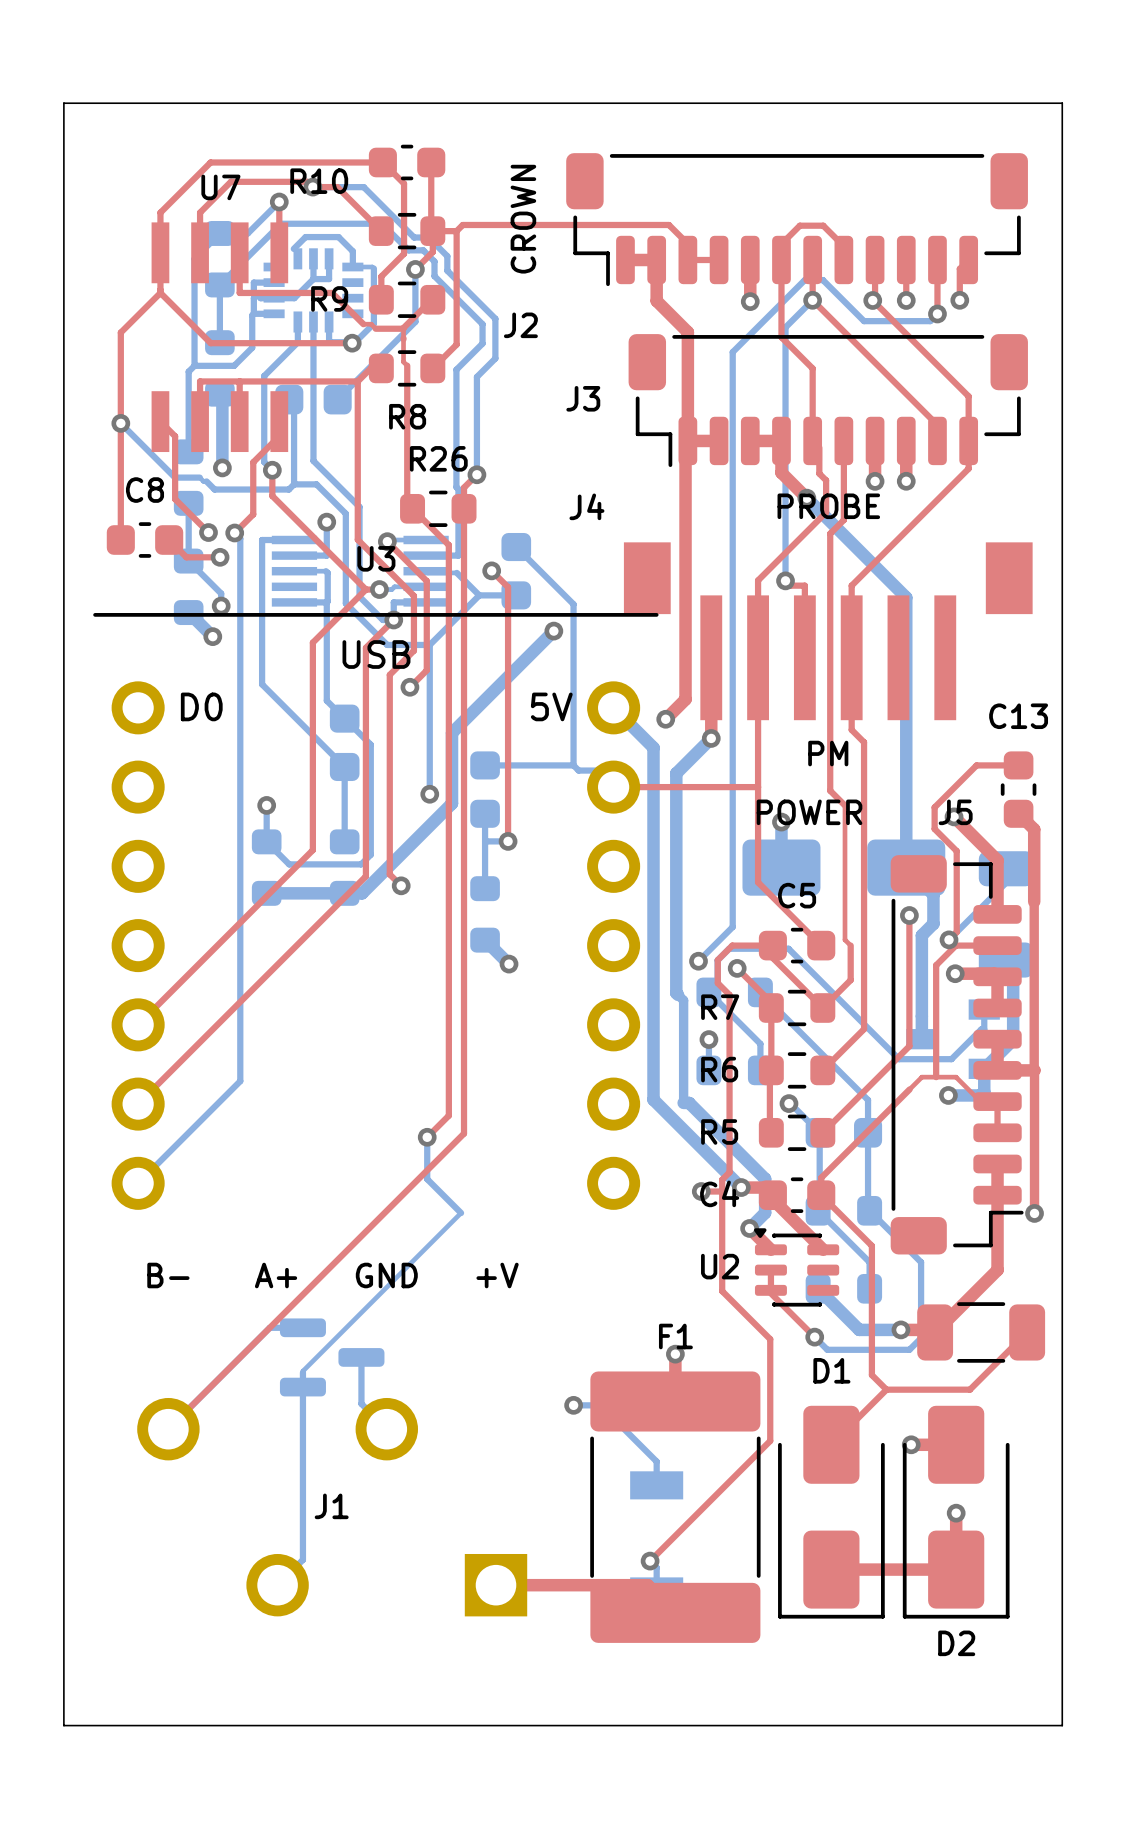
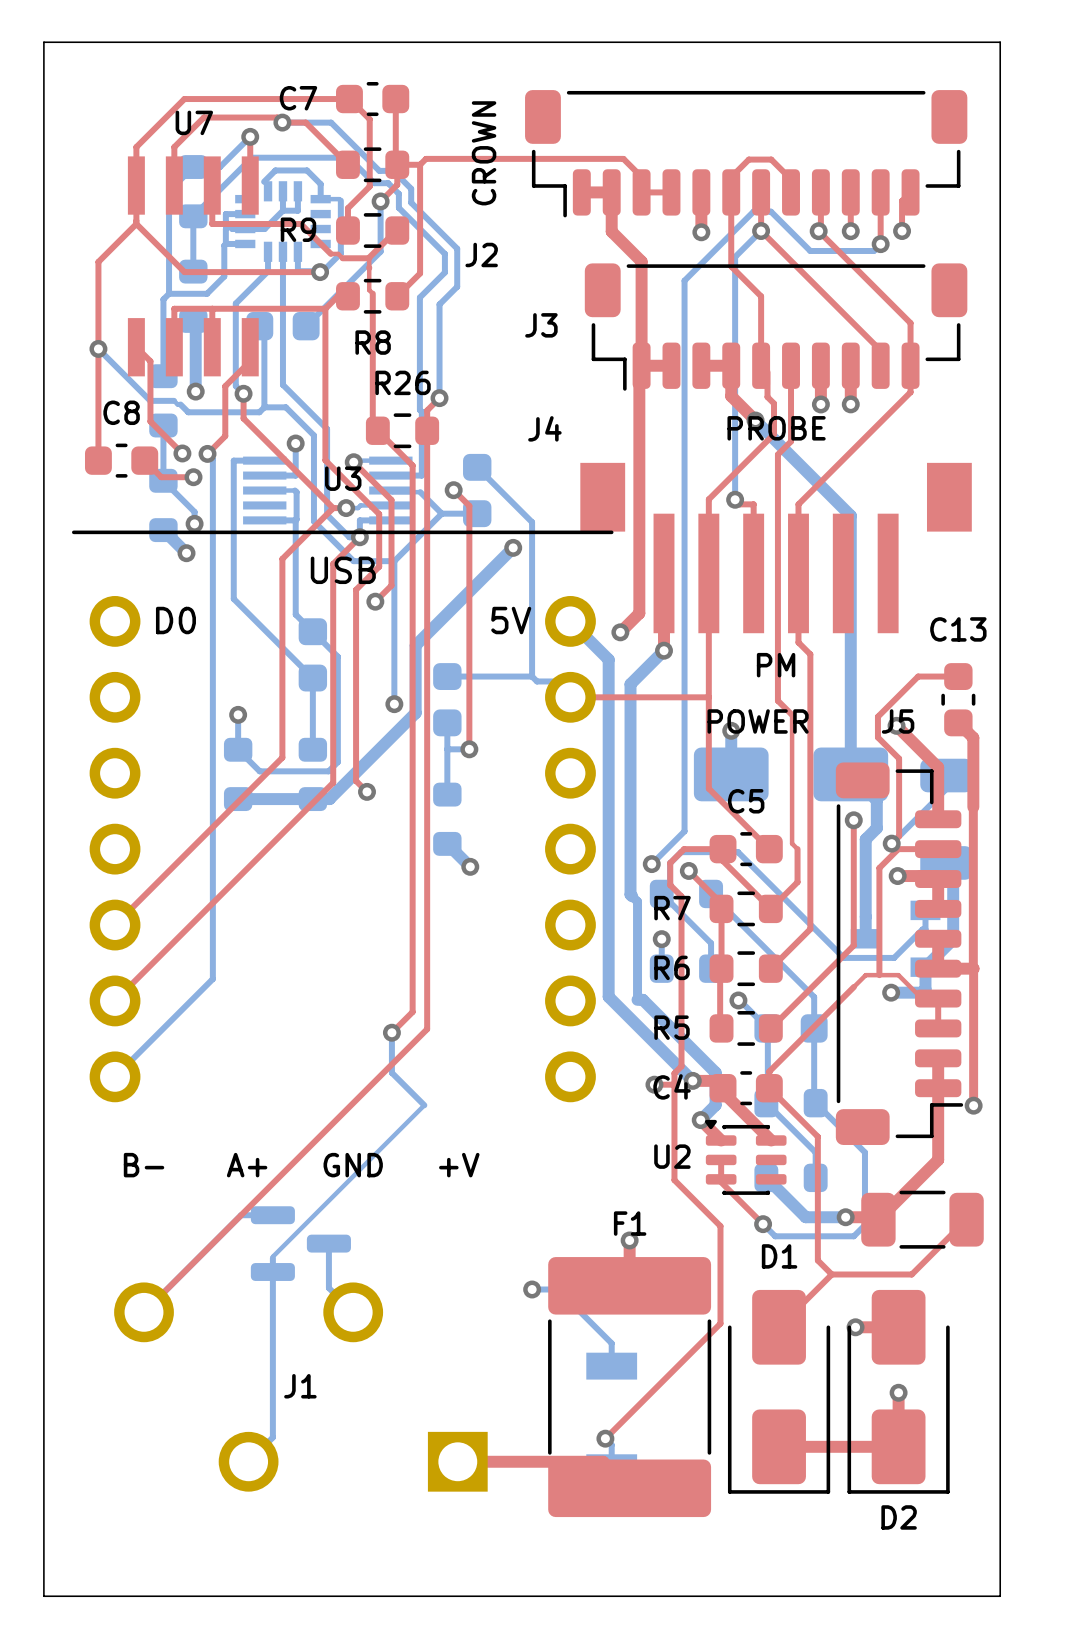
C7 name: none -> C7 (298, 98)
R10 name: R10 (319, 181) -> none

